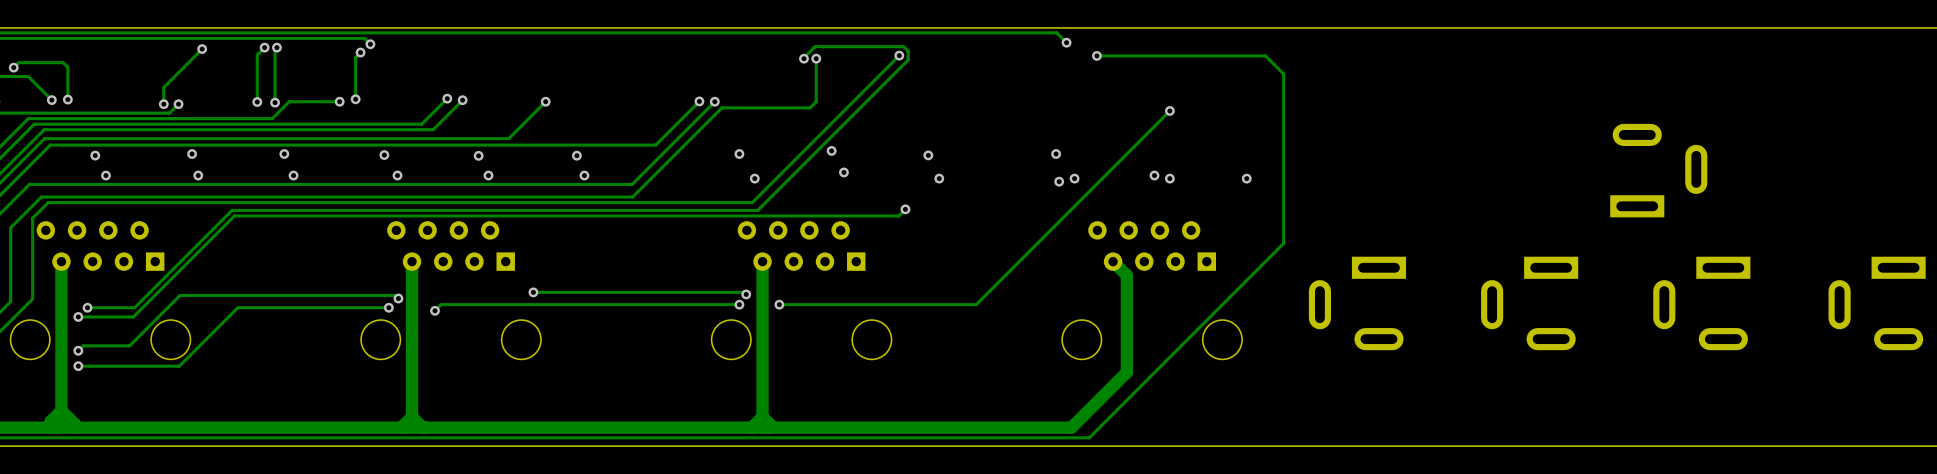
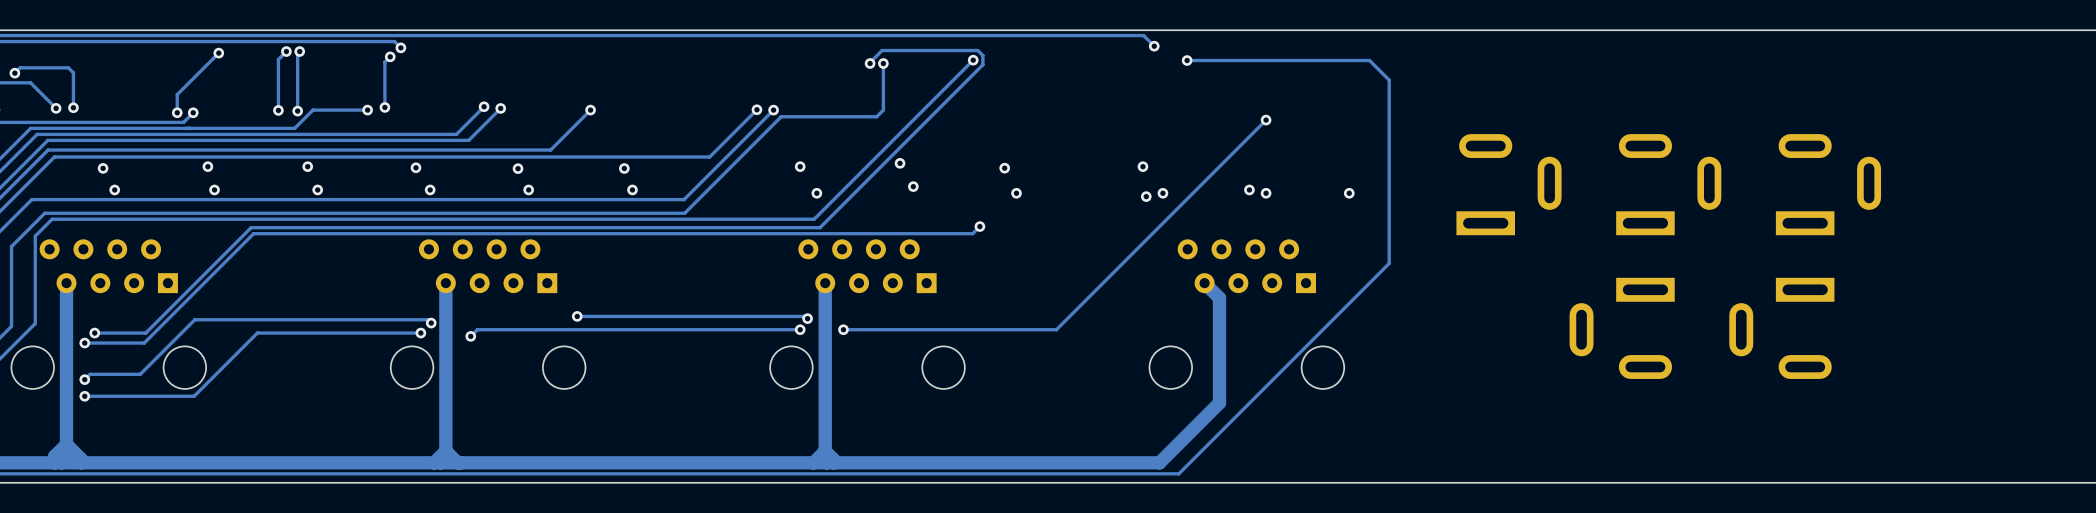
part: none -> (1509, 184)
part: none -> (1668, 184)
part position: (1658, 170) -> (1828, 184)
part: (1357, 303) -> none
part position: (1529, 303) -> (1622, 328)
part position: (1701, 303) -> (1781, 328)
part: (1877, 303) -> none

